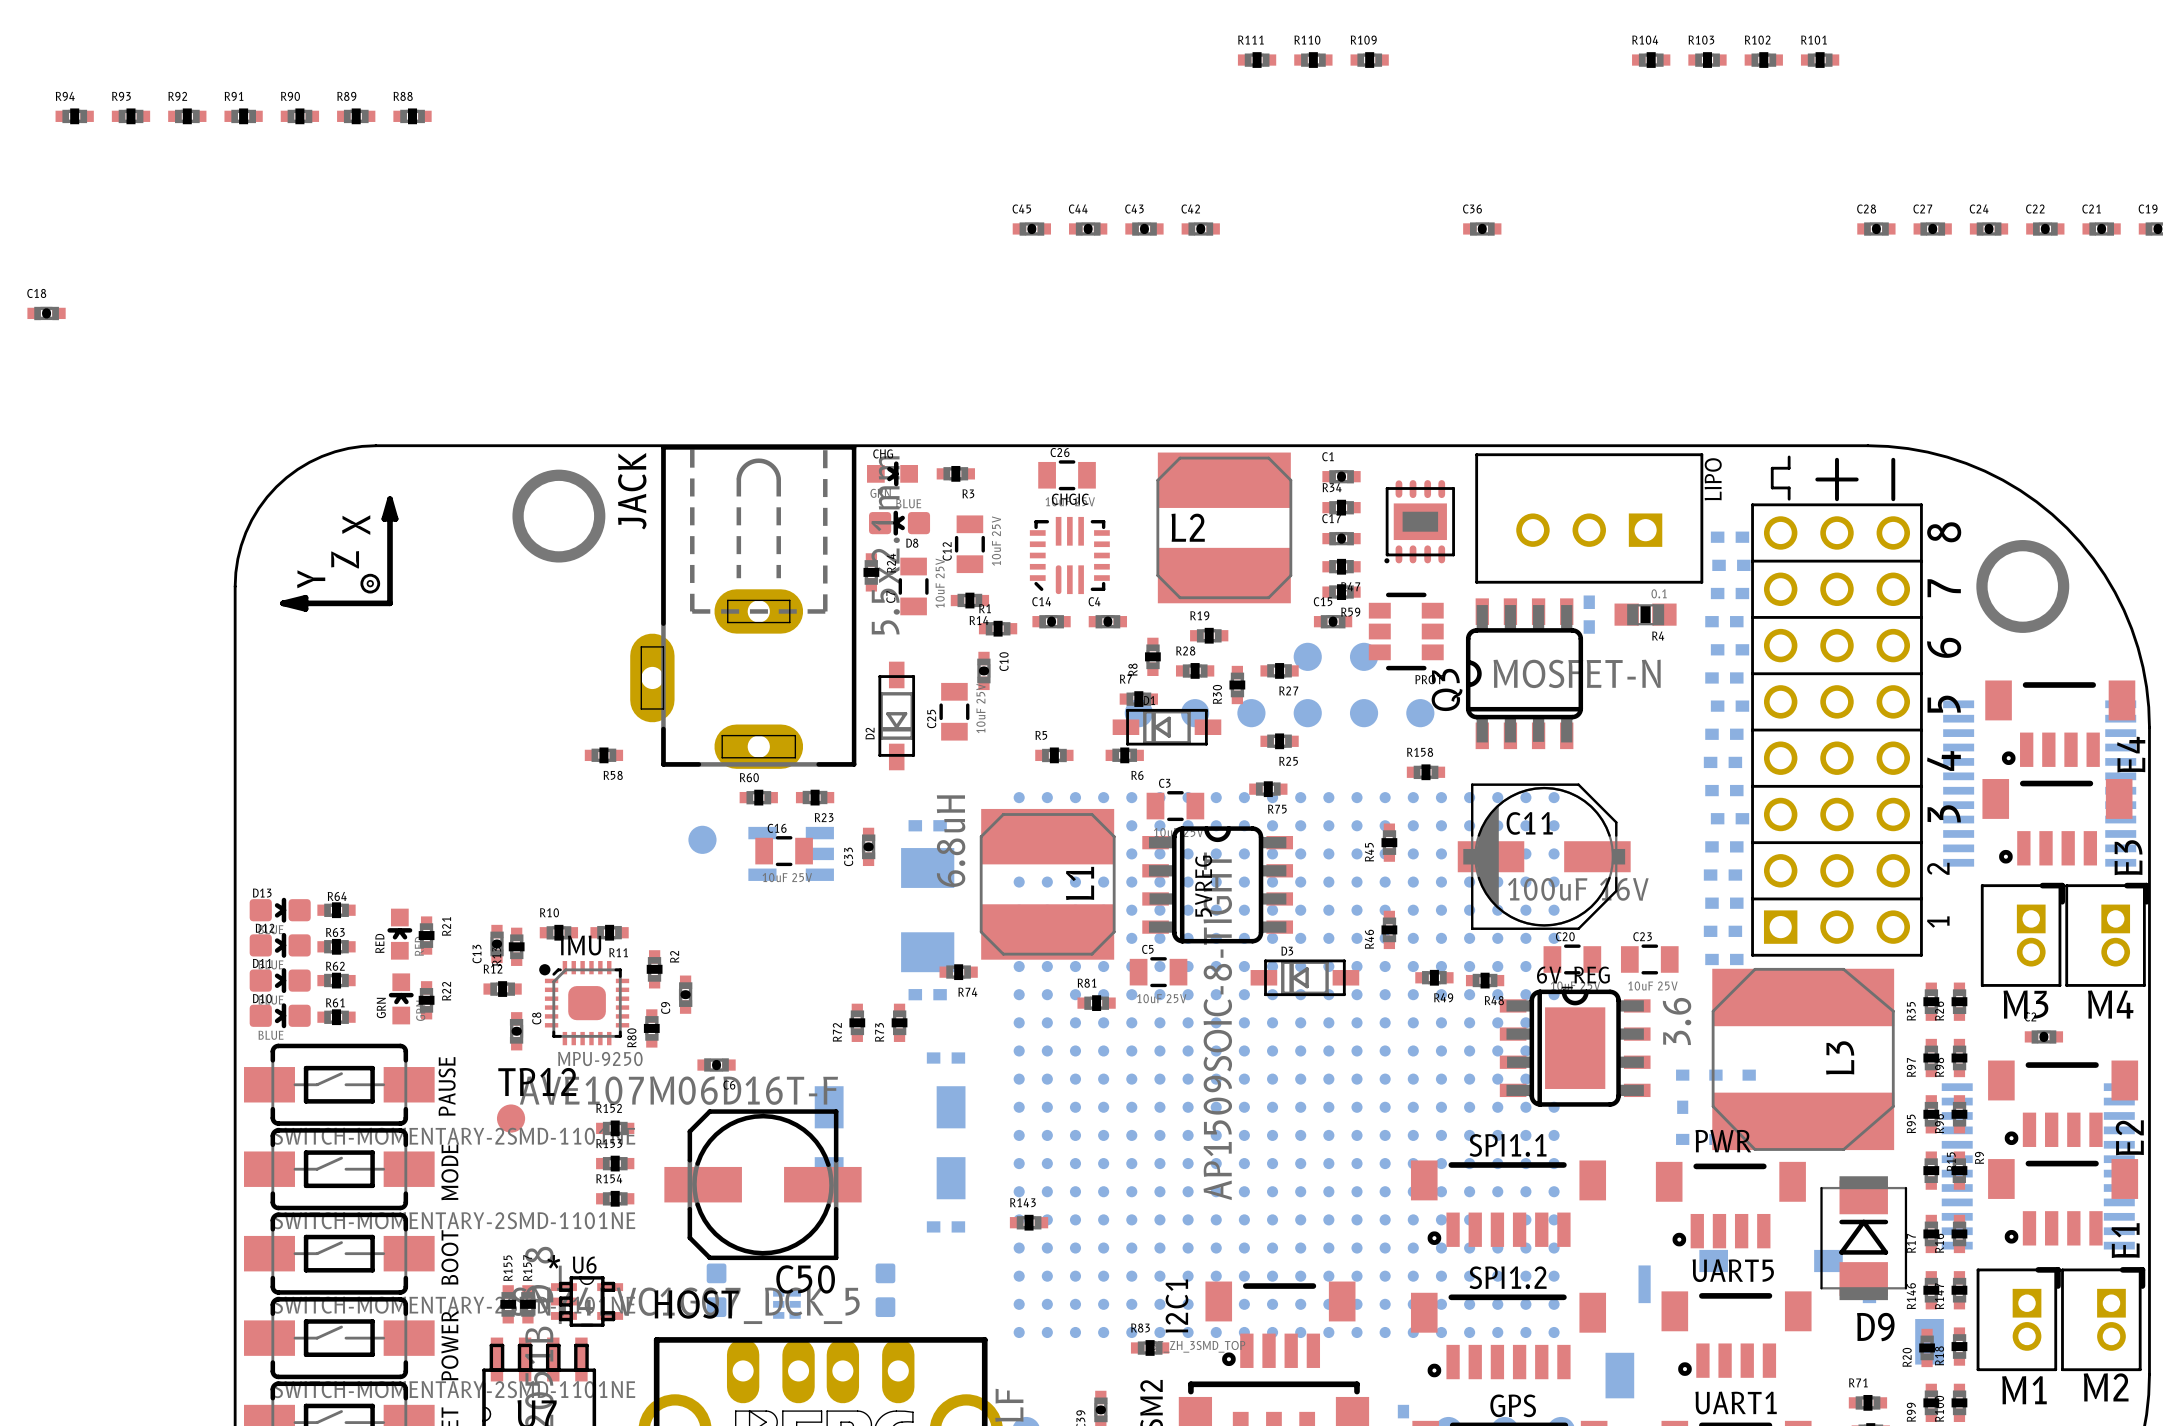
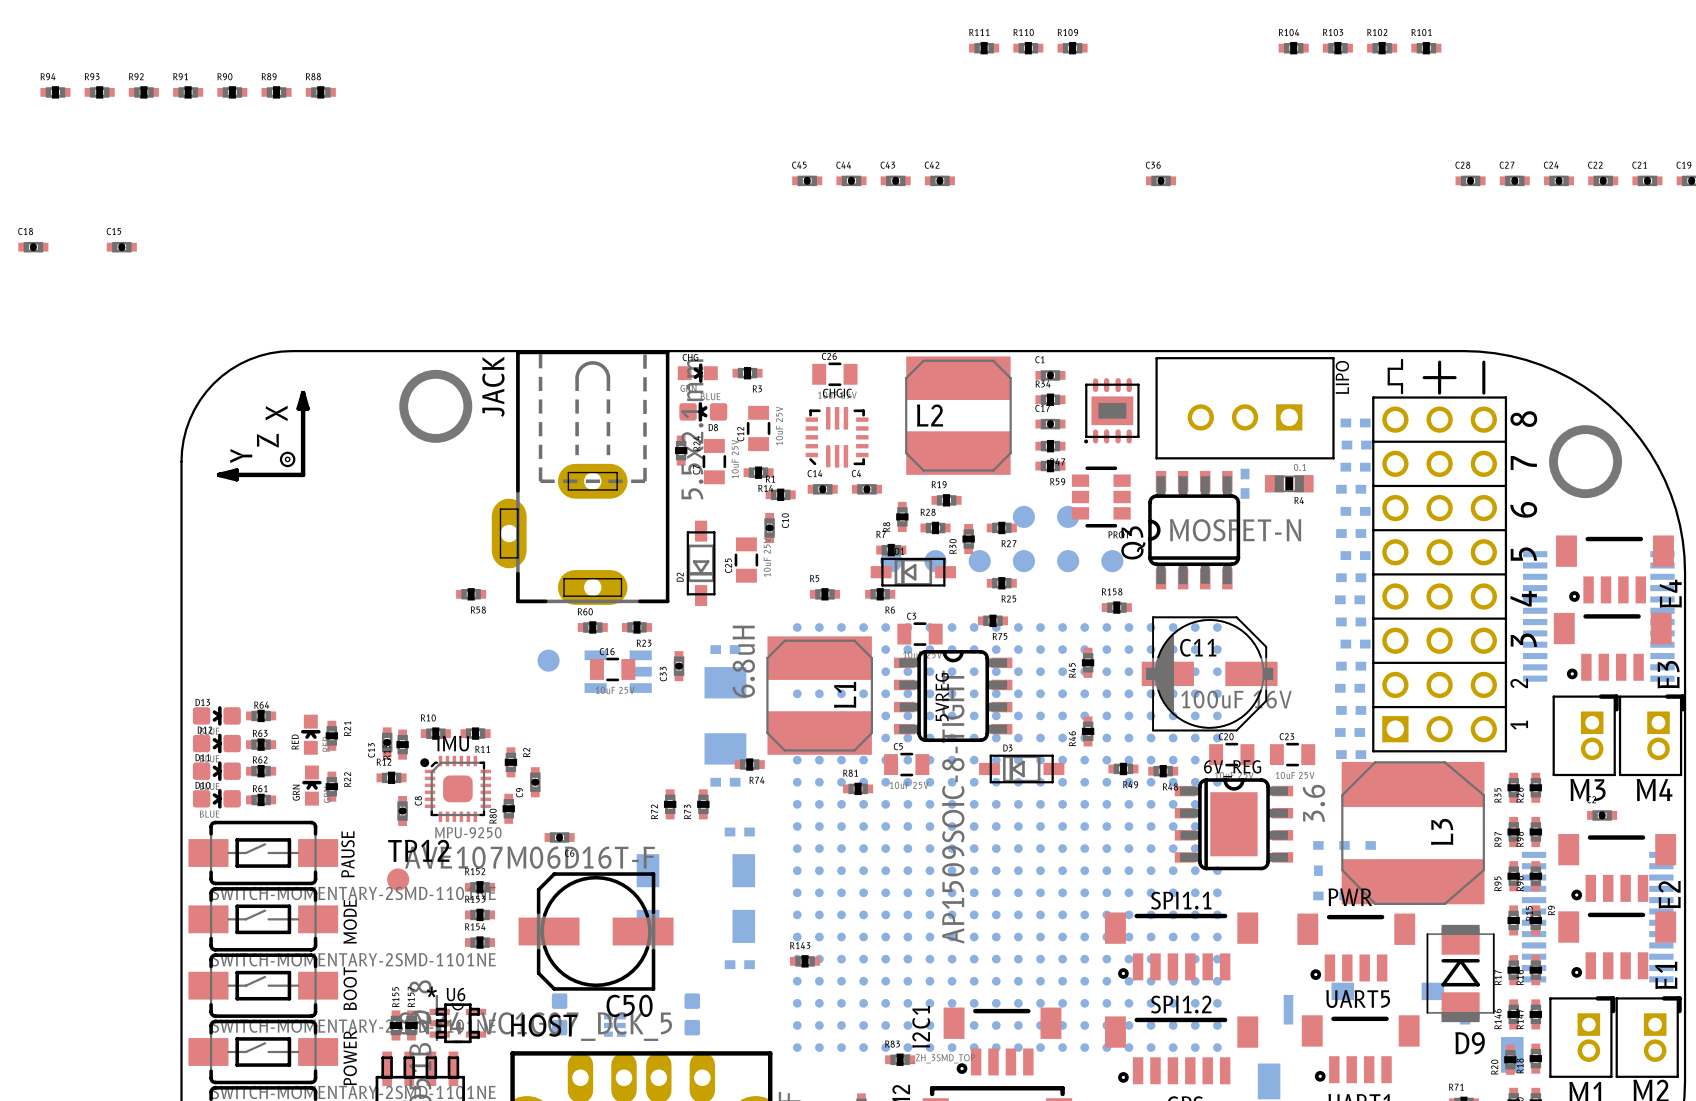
C15 position: (1333, 621) -> (121, 247)

